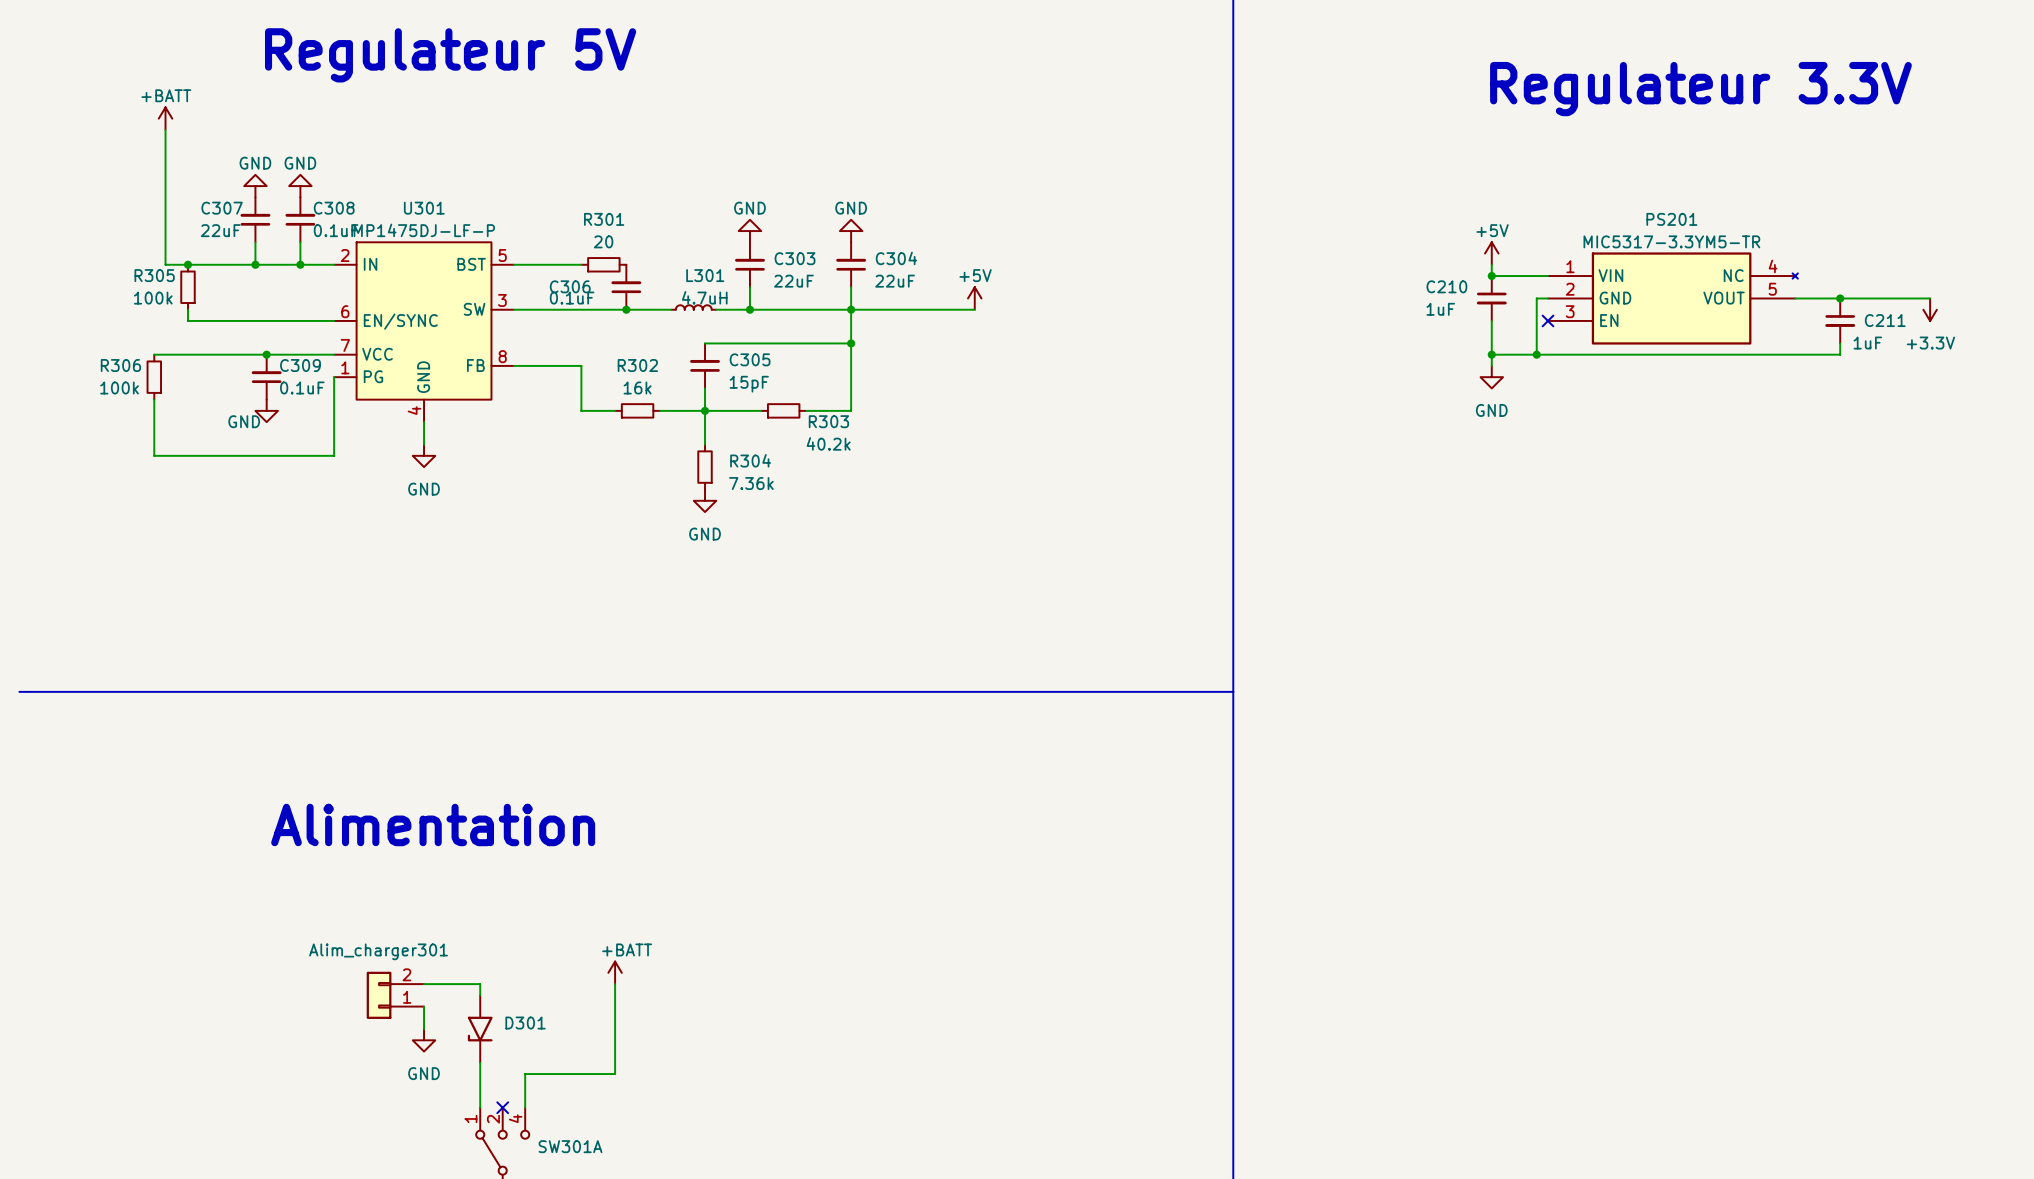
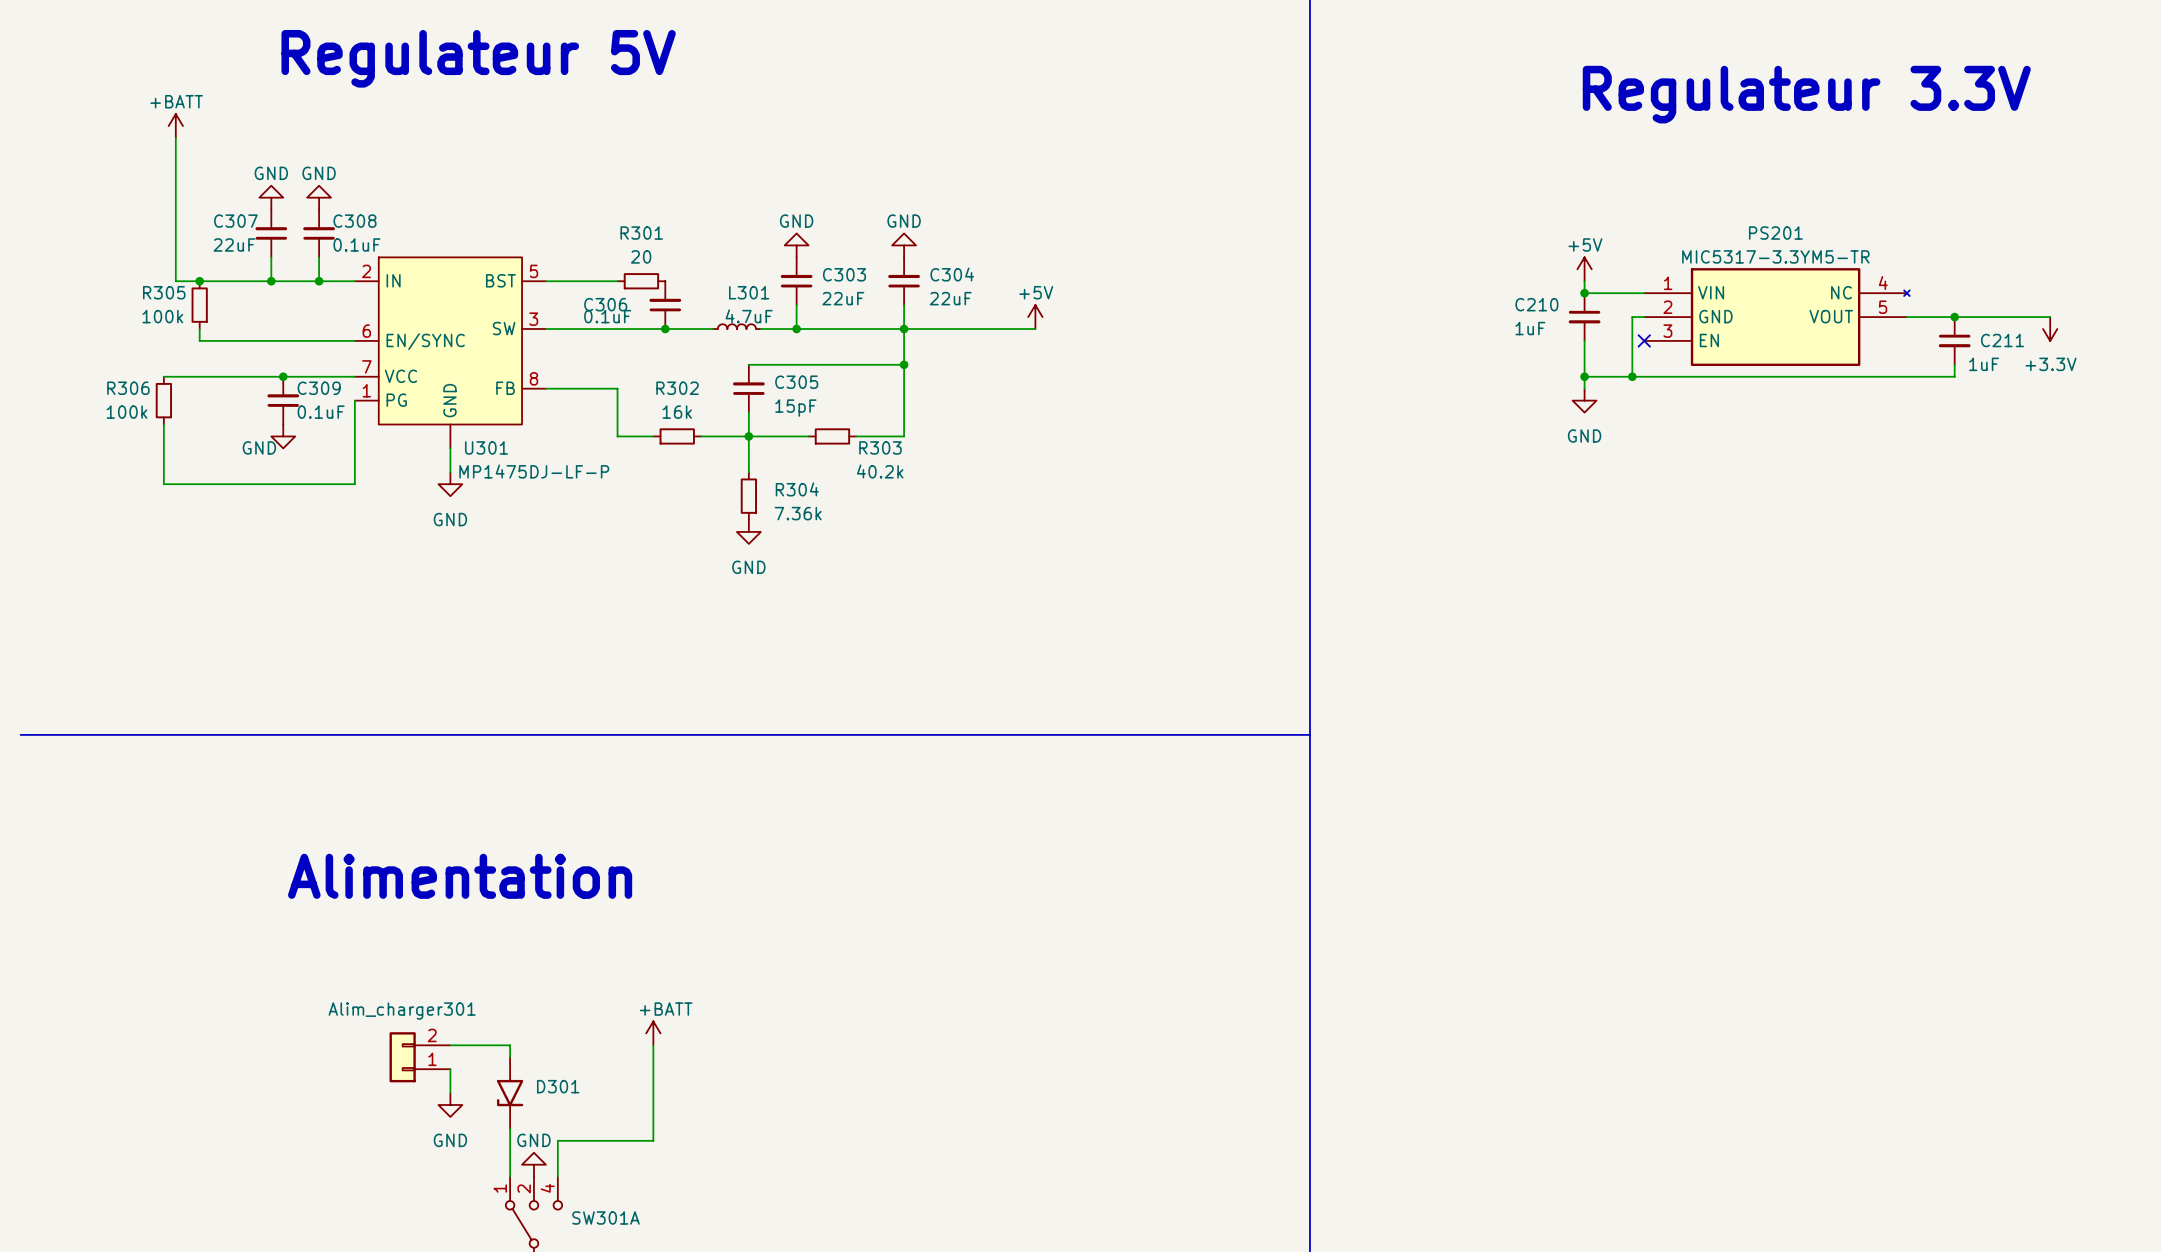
U301 name position: U301 (424, 208) -> U301 (486, 447)
U301 value position: MP1475DJ-LF-P (424, 230) -> MP1475DJ-LF-P (534, 471)
L301 value: 4.7uH (704, 297) -> 4.7uF (749, 316)
U301 pin number: 4 (414, 410) -> none
power symbol: none -> GND (533, 1164)
no-connect mark: (502, 1107) -> none

